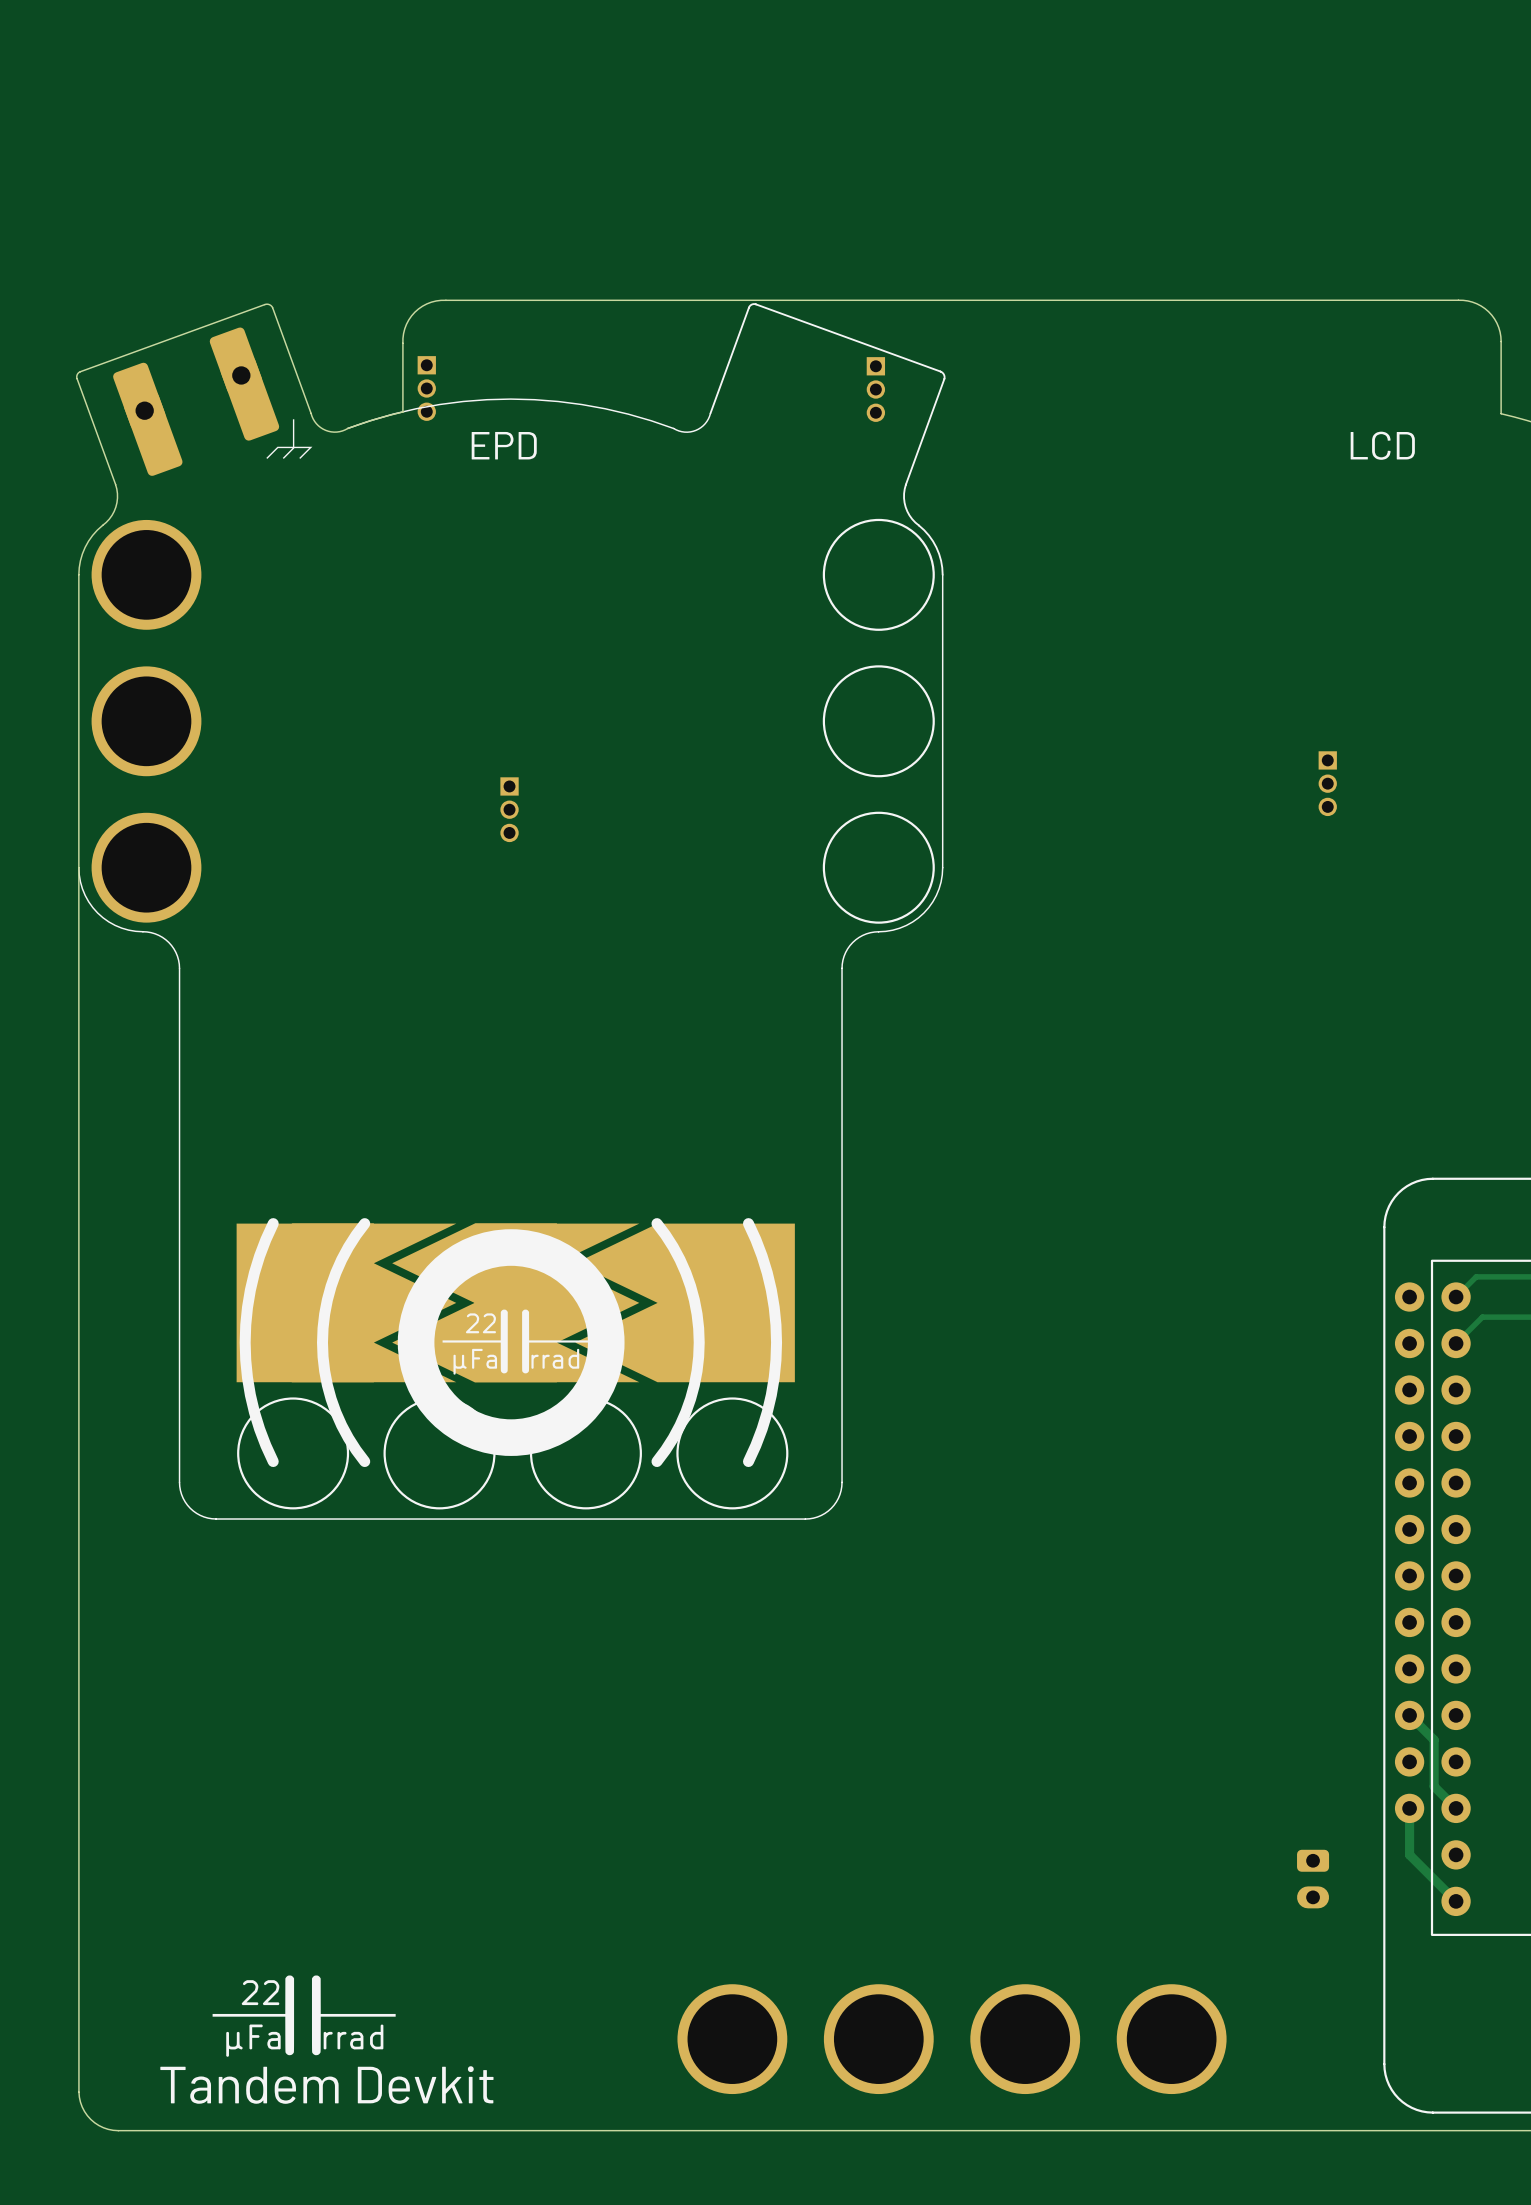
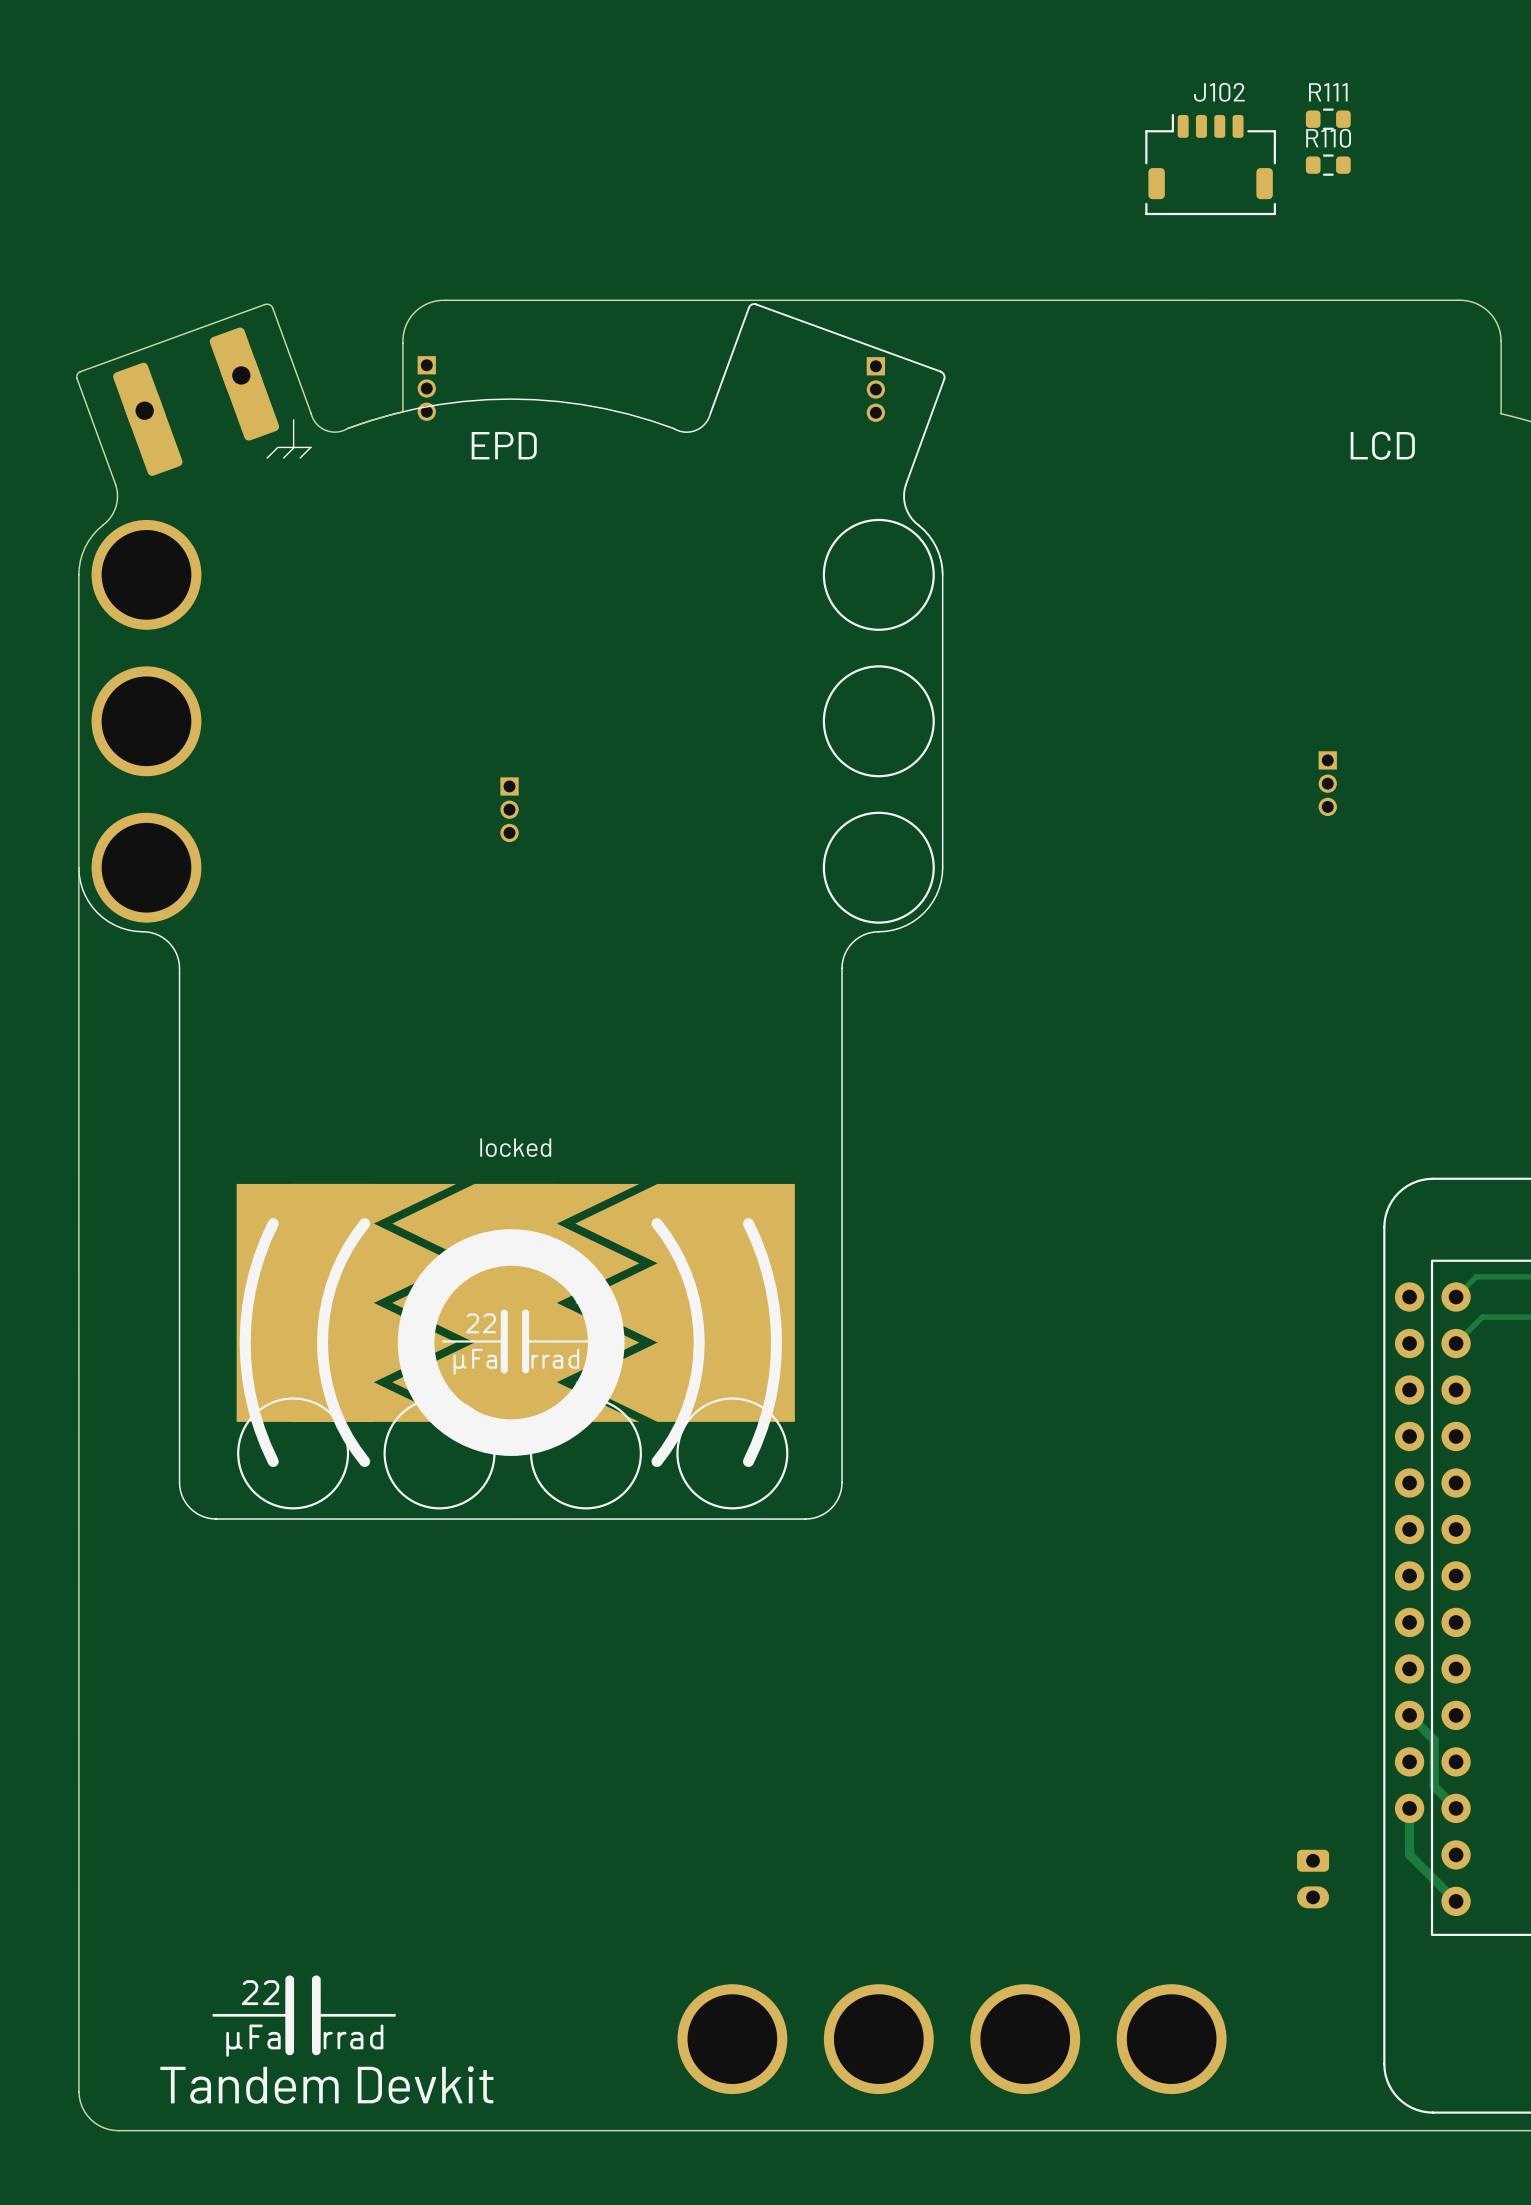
R111: none -> (1328, 119)
J102: none -> (1210, 164)
R110: none -> (1328, 165)
part: (515, 1302) -> none
locked: none -> (515, 1302)

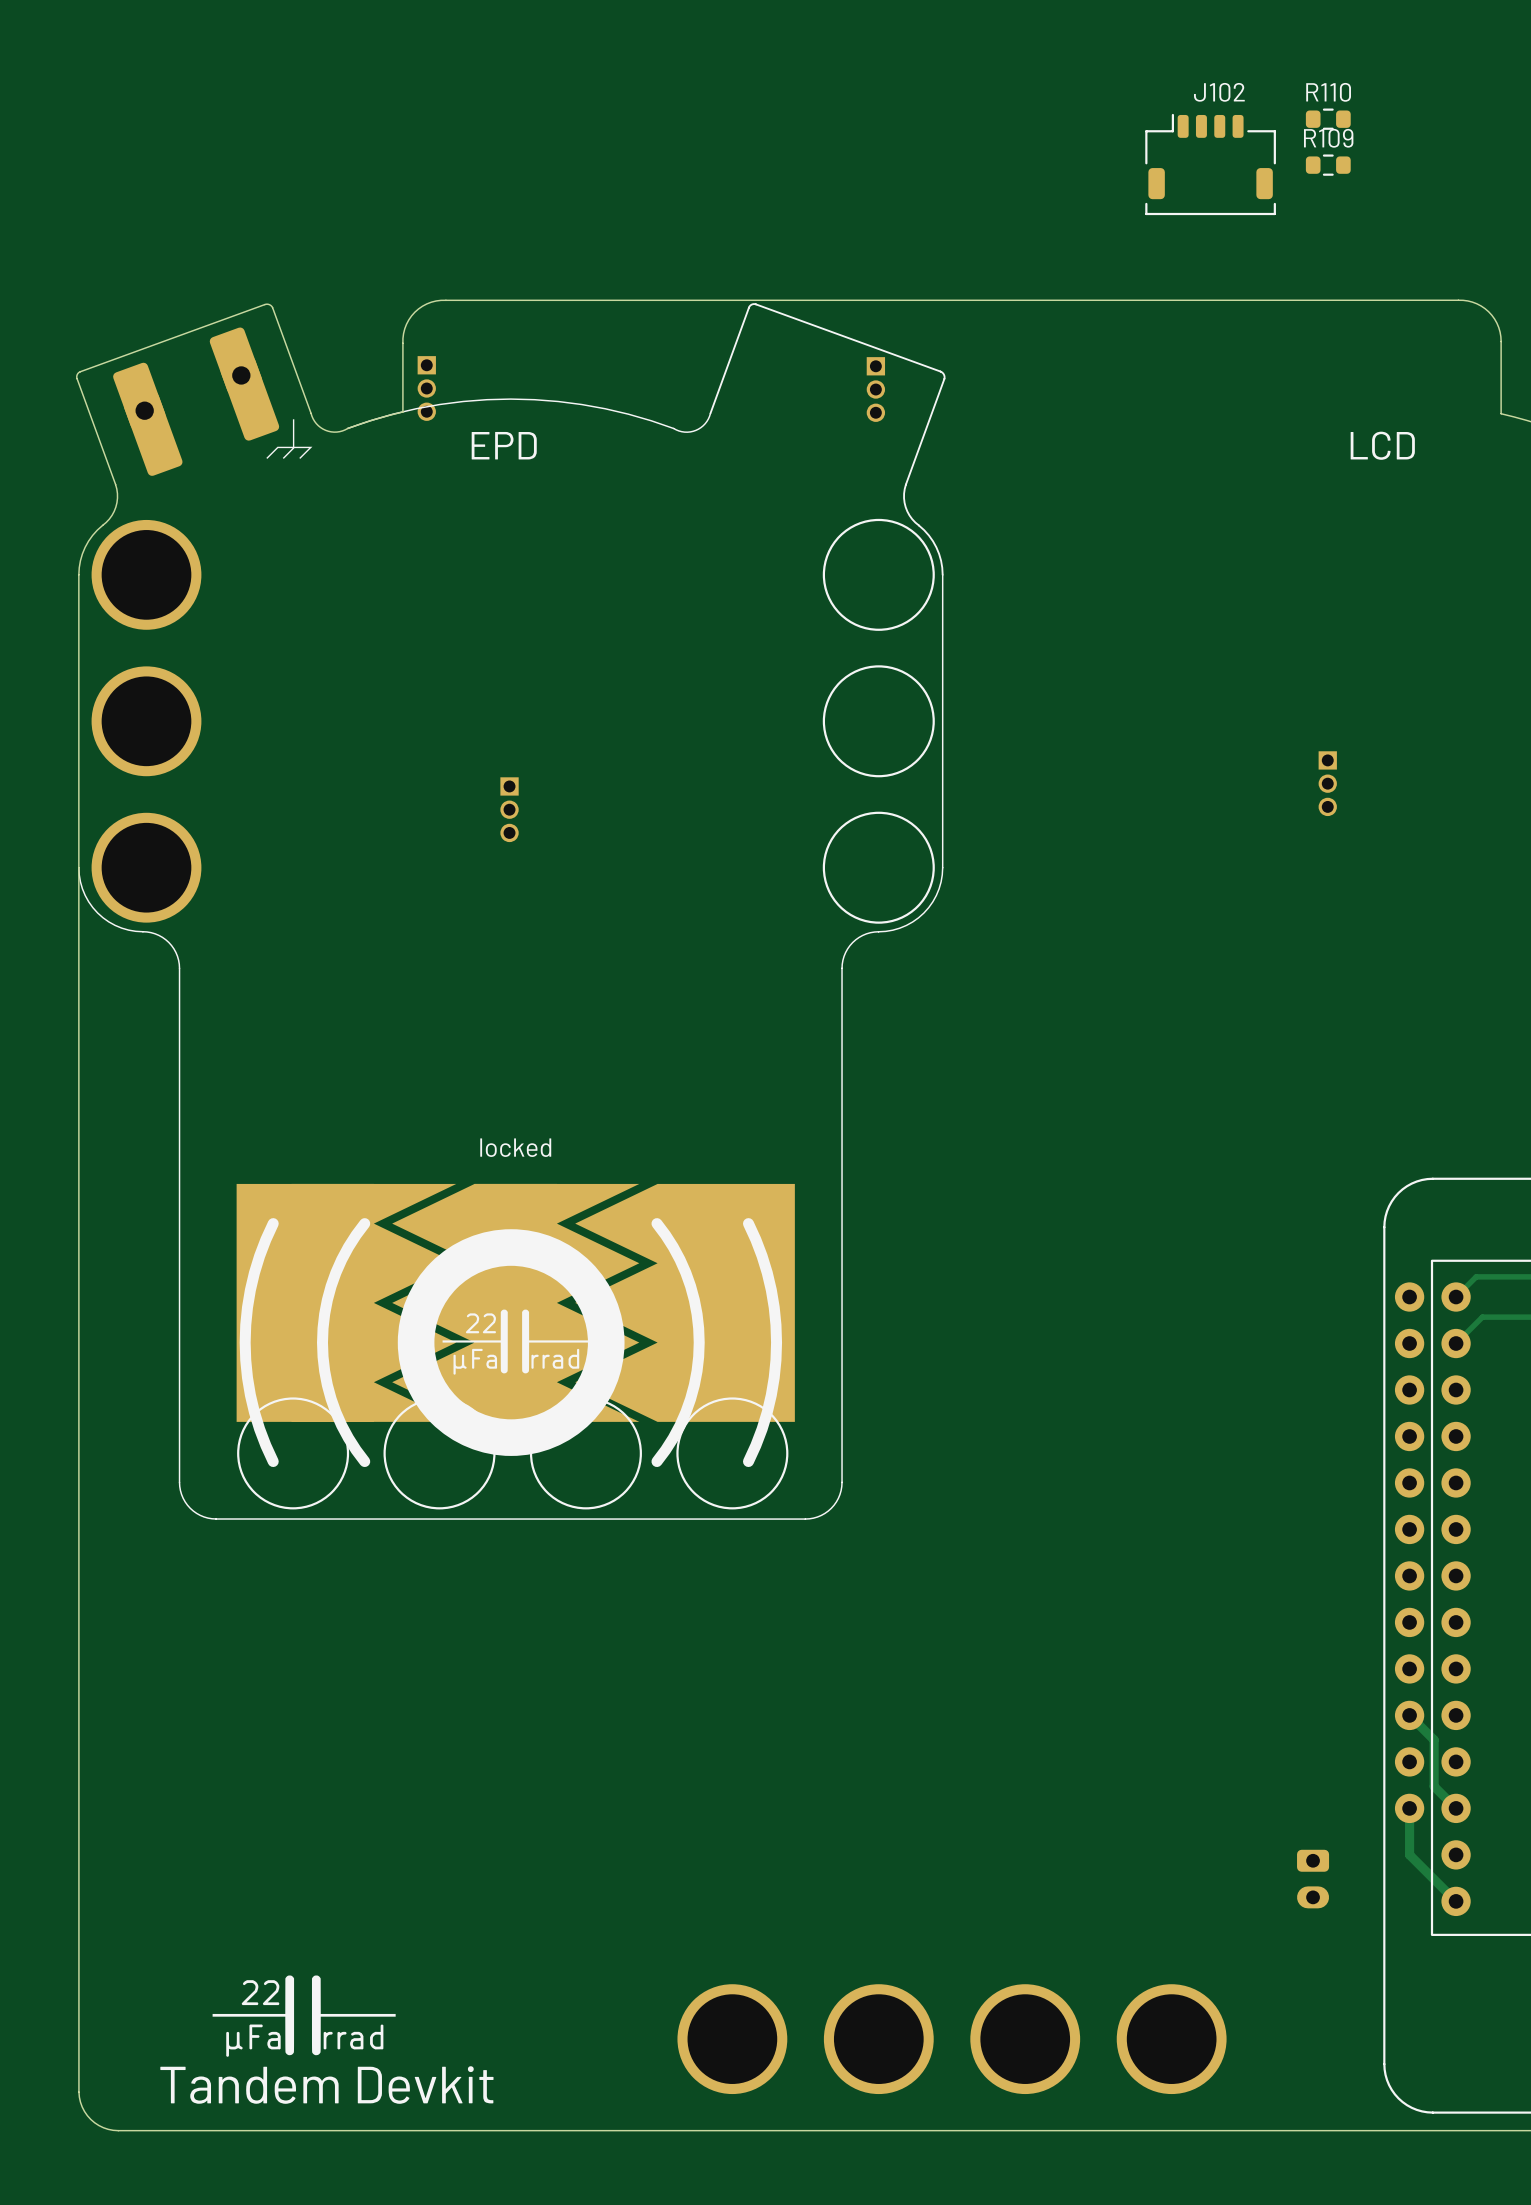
R111 name: R111 (1328, 92) -> R110 (1328, 92)
R110 name: R110 (1328, 138) -> R109 (1328, 138)

